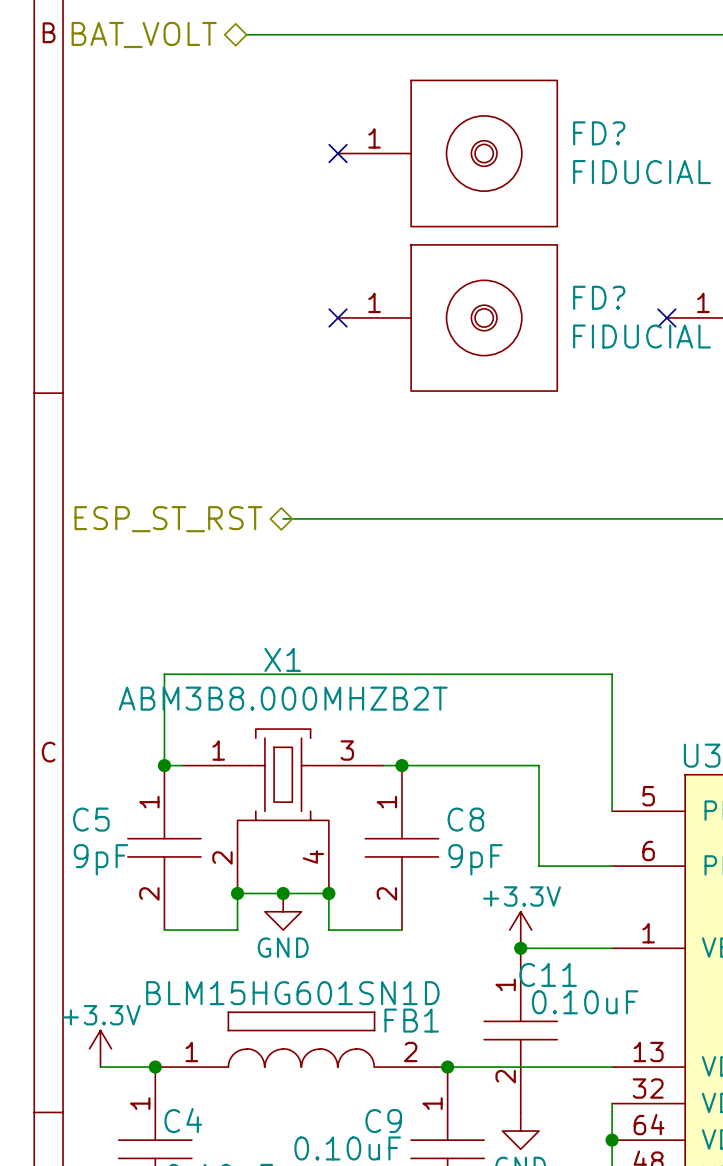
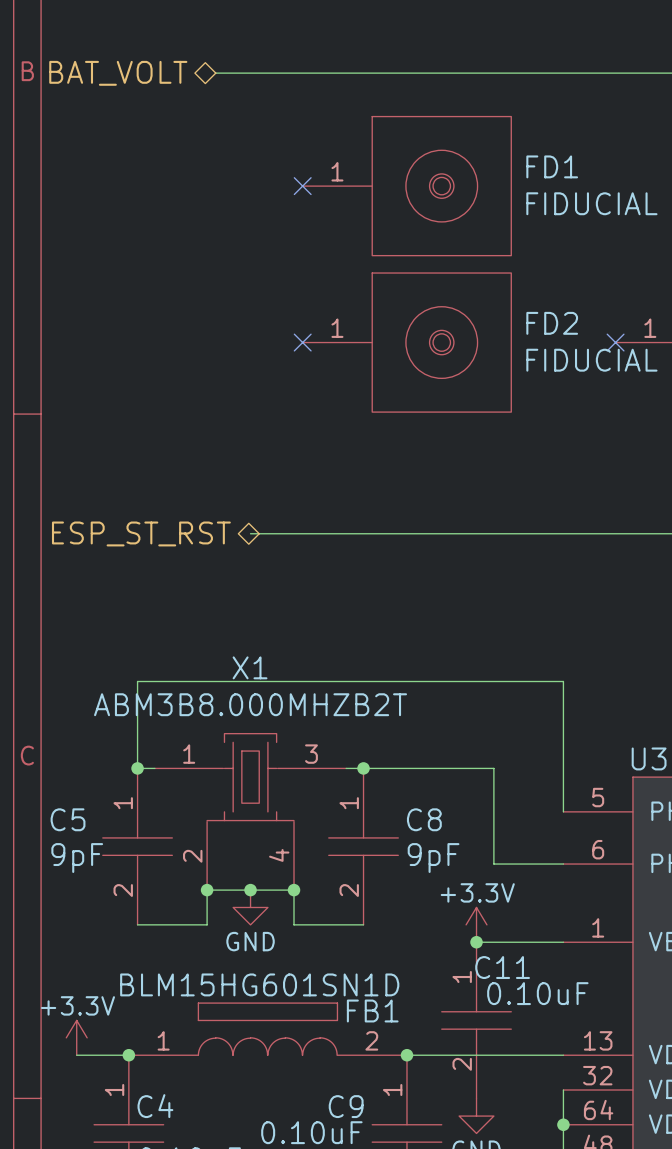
FD? name: FD? (599, 133) -> FD1 (552, 166)
FD? name: FD? (599, 297) -> FD2 (552, 323)

